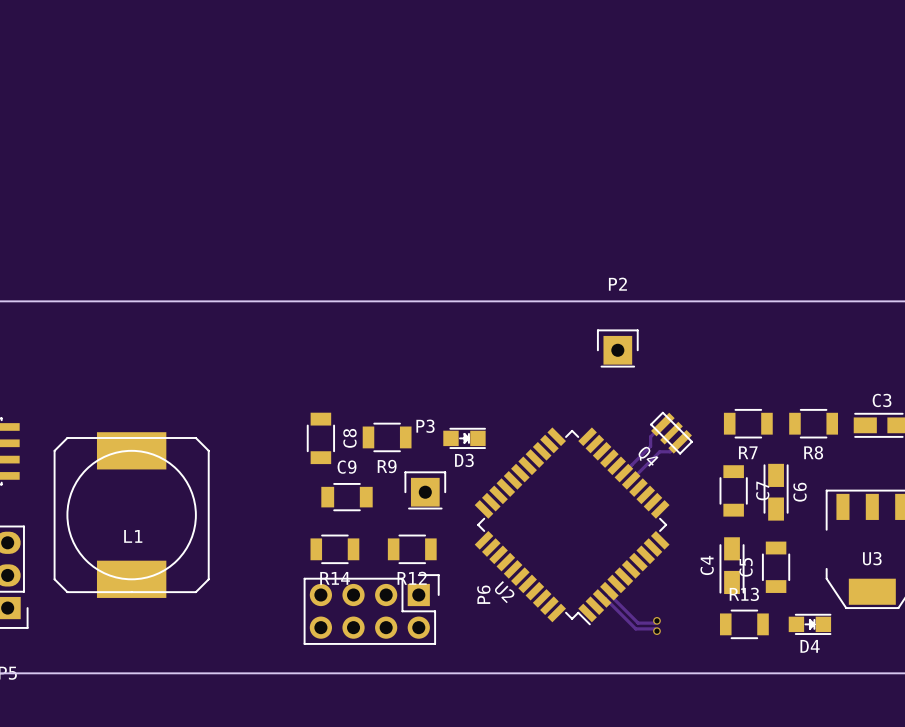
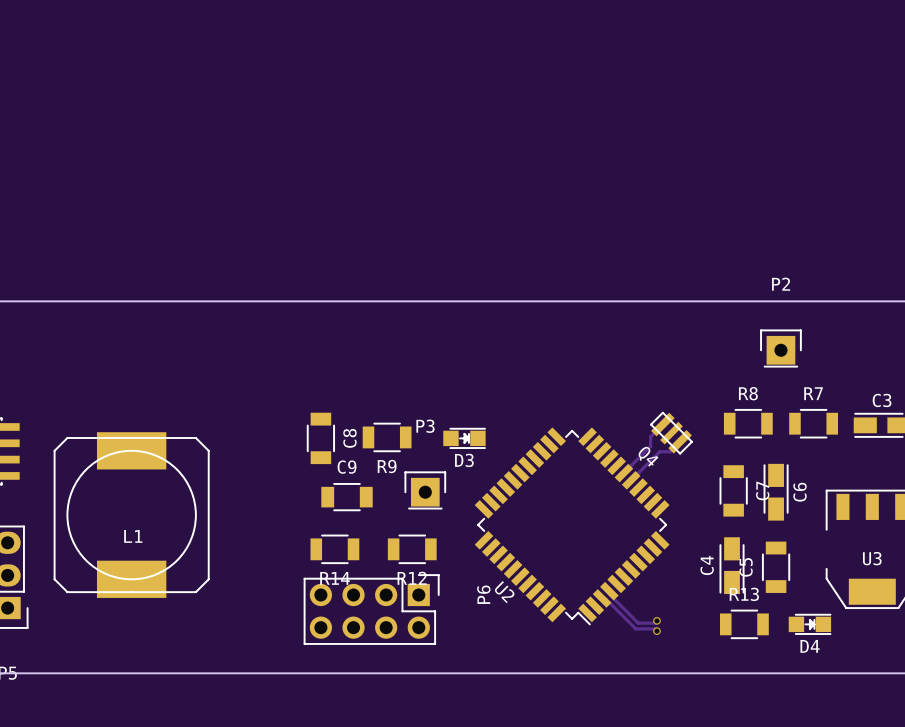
P2 position: (617, 348) -> (780, 348)
R7 name: R7 (748, 452) -> R8 (748, 393)
R8 name: R8 (813, 452) -> R7 (813, 393)

